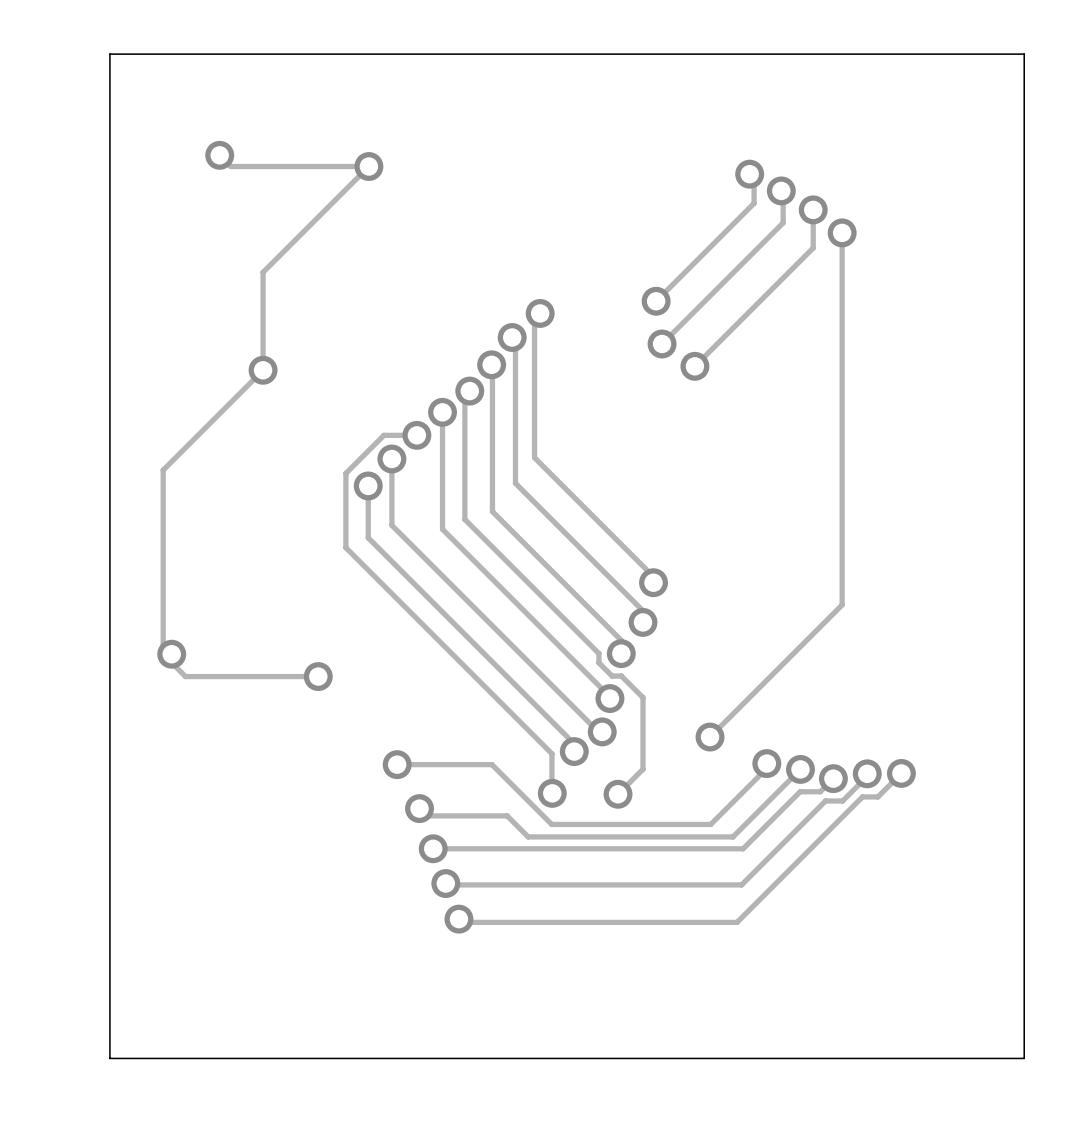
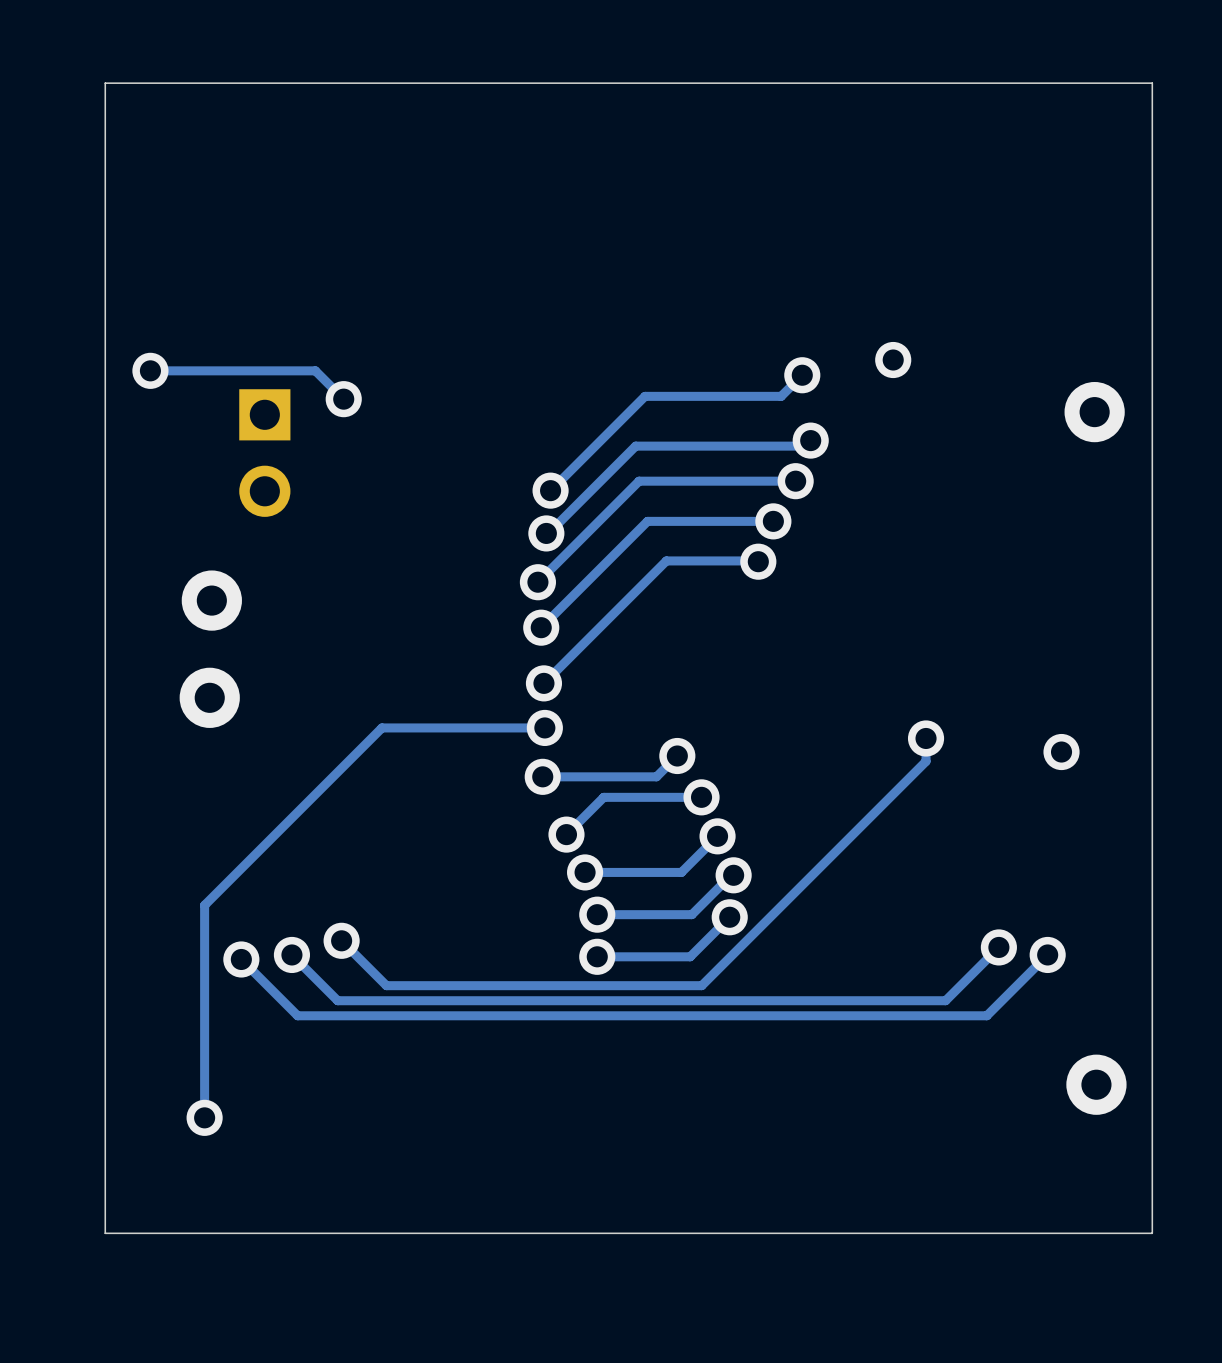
track: (219, 155) (230, 166) (368, 166) (263, 272) (263, 370) (163, 470) (163, 645) (171, 654) (171, 662) (185, 676) (318, 676) -> none
via: (219, 155) -> none
via: (368, 166) -> none
track: (749, 174) (754, 178) (754, 203) (656, 301) -> none
via: (749, 174) -> none
track: (781, 190) (783, 192) (783, 222) (662, 343) -> none
via: (781, 190) -> none
track: (813, 209) (813, 248) (694, 366) -> none
via: (813, 209) -> none
track: (842, 232) (842, 604) (710, 737) -> none
via: (842, 232) -> none
via: none -> (893, 360)
via: (656, 301) -> none
track: none -> (150, 370) (315, 370) (343, 399)
via: none -> (150, 370)
track: none -> (802, 375) (781, 396) (645, 396) (550, 490)
via: none -> (802, 375)
track: (540, 313) (534, 319) (534, 457) (653, 576) (653, 582) -> none
via: (540, 313) -> none
via: none -> (343, 399)
track: (512, 337) (515, 340) (515, 483) (642, 610) (642, 622) -> none
via: (512, 337) -> none
via: none -> (1094, 412)
via: (662, 343) -> none
track: (491, 364) (492, 511) (621, 640) (621, 653) -> none
via: (491, 364) -> none
via: (694, 366) -> none
track: none -> (810, 440) (805, 446) (635, 446) (546, 533)
via: none -> (810, 440)
via: (263, 370) -> none
part: none -> (264, 453)
track: (469, 391) (464, 395) (464, 519) (598, 653) (598, 662) (612, 676) (621, 676) (642, 697) (642, 769) (618, 794) -> none
via: (469, 391) -> none
track: none -> (795, 481) (639, 481) (538, 582)
via: none -> (795, 481)
via: none -> (550, 490)
track: (442, 412) (442, 529) (609, 698) -> none
via: (442, 412) -> none
track: (416, 435) (383, 435) (345, 473) (345, 547) (551, 753) (551, 793) -> none
via: (416, 435) -> none
track: none -> (773, 521) (647, 521) (541, 627)
via: none -> (773, 521)
via: none -> (546, 533)
track: (391, 459) (391, 525) (598, 731) (602, 731) -> none
via: (391, 459) -> none
track: none -> (758, 561) (666, 560) (543, 683)
via: none -> (758, 561)
track: (368, 485) (368, 537) (574, 743) (574, 751) -> none
via: (368, 485) -> none
via: none -> (537, 582)
via: none -> (211, 600)
via: none -> (541, 627)
via: none -> (543, 683)
via: (653, 582) -> none
via: none -> (209, 697)
track: none -> (544, 727) (381, 727) (204, 905) (204, 1117)
via: none -> (544, 727)
via: (642, 622) -> none
track: none -> (926, 738) (926, 761) (701, 985) (386, 985) (341, 940)
via: none -> (926, 738)
via: none -> (1061, 752)
track: none -> (677, 756) (656, 776) (542, 776)
via: none -> (677, 756)
via: (621, 653) -> none
via: (171, 654) -> none
via: none -> (542, 776)
via: (318, 676) -> none
track: none -> (701, 797) (603, 797) (566, 834)
via: none -> (701, 797)
via: (609, 698) -> none
via: none -> (566, 834)
track: none -> (717, 836) (681, 872) (585, 872)
via: none -> (717, 836)
via: (602, 731) -> none
via: (710, 737) -> none
via: none -> (585, 872)
track: none -> (733, 875) (731, 875) (691, 914) (597, 914)
via: none -> (733, 875)
via: (574, 751) -> none
track: (766, 763) (766, 768) (710, 824) (551, 824) (491, 764) (397, 764) -> none
via: (766, 763) -> none
via: (397, 764) -> none
track: (800, 769) (732, 836) (528, 836) (507, 815) (426, 815) (419, 808) -> none
via: (800, 769) -> none
track: (867, 773) (867, 776) (842, 800) (825, 800) (741, 884) (445, 883) -> none
via: (867, 773) -> none
track: (901, 773) (877, 796) (862, 796) (737, 922) (462, 922) (458, 919) -> none
via: (901, 773) -> none
track: (833, 778) (820, 791) (800, 791) (743, 848) (433, 848) -> none
via: (833, 778) -> none
via: none -> (597, 914)
track: none -> (729, 917) (690, 956) (597, 956)
via: none -> (729, 917)
via: (552, 793) -> none
via: (618, 794) -> none
via: none -> (341, 940)
via: (419, 808) -> none
track: none -> (998, 947) (945, 1000) (337, 1000) (291, 954)
via: none -> (998, 947)
via: none -> (291, 954)
track: none -> (1047, 954) (986, 1015) (297, 1015) (241, 959)
via: none -> (1047, 954)
via: none -> (597, 956)
via: none -> (241, 959)
via: (433, 848) -> none
via: (445, 883) -> none
via: (458, 919) -> none
via: none -> (1096, 1084)
via: none -> (204, 1117)

